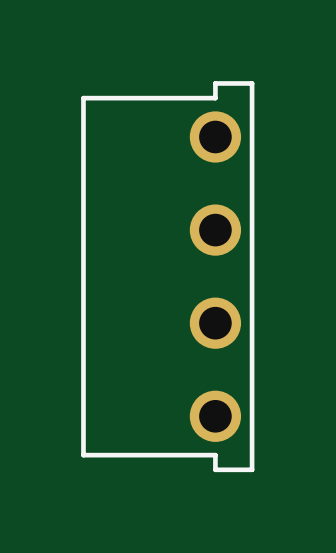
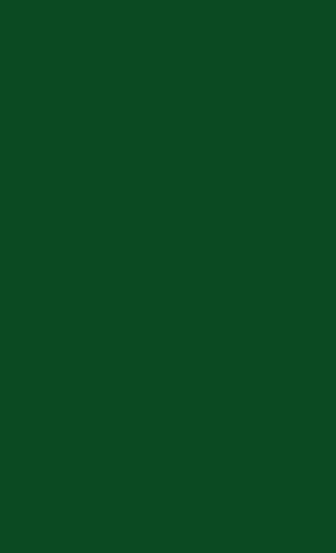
part: (167, 276) -> none

